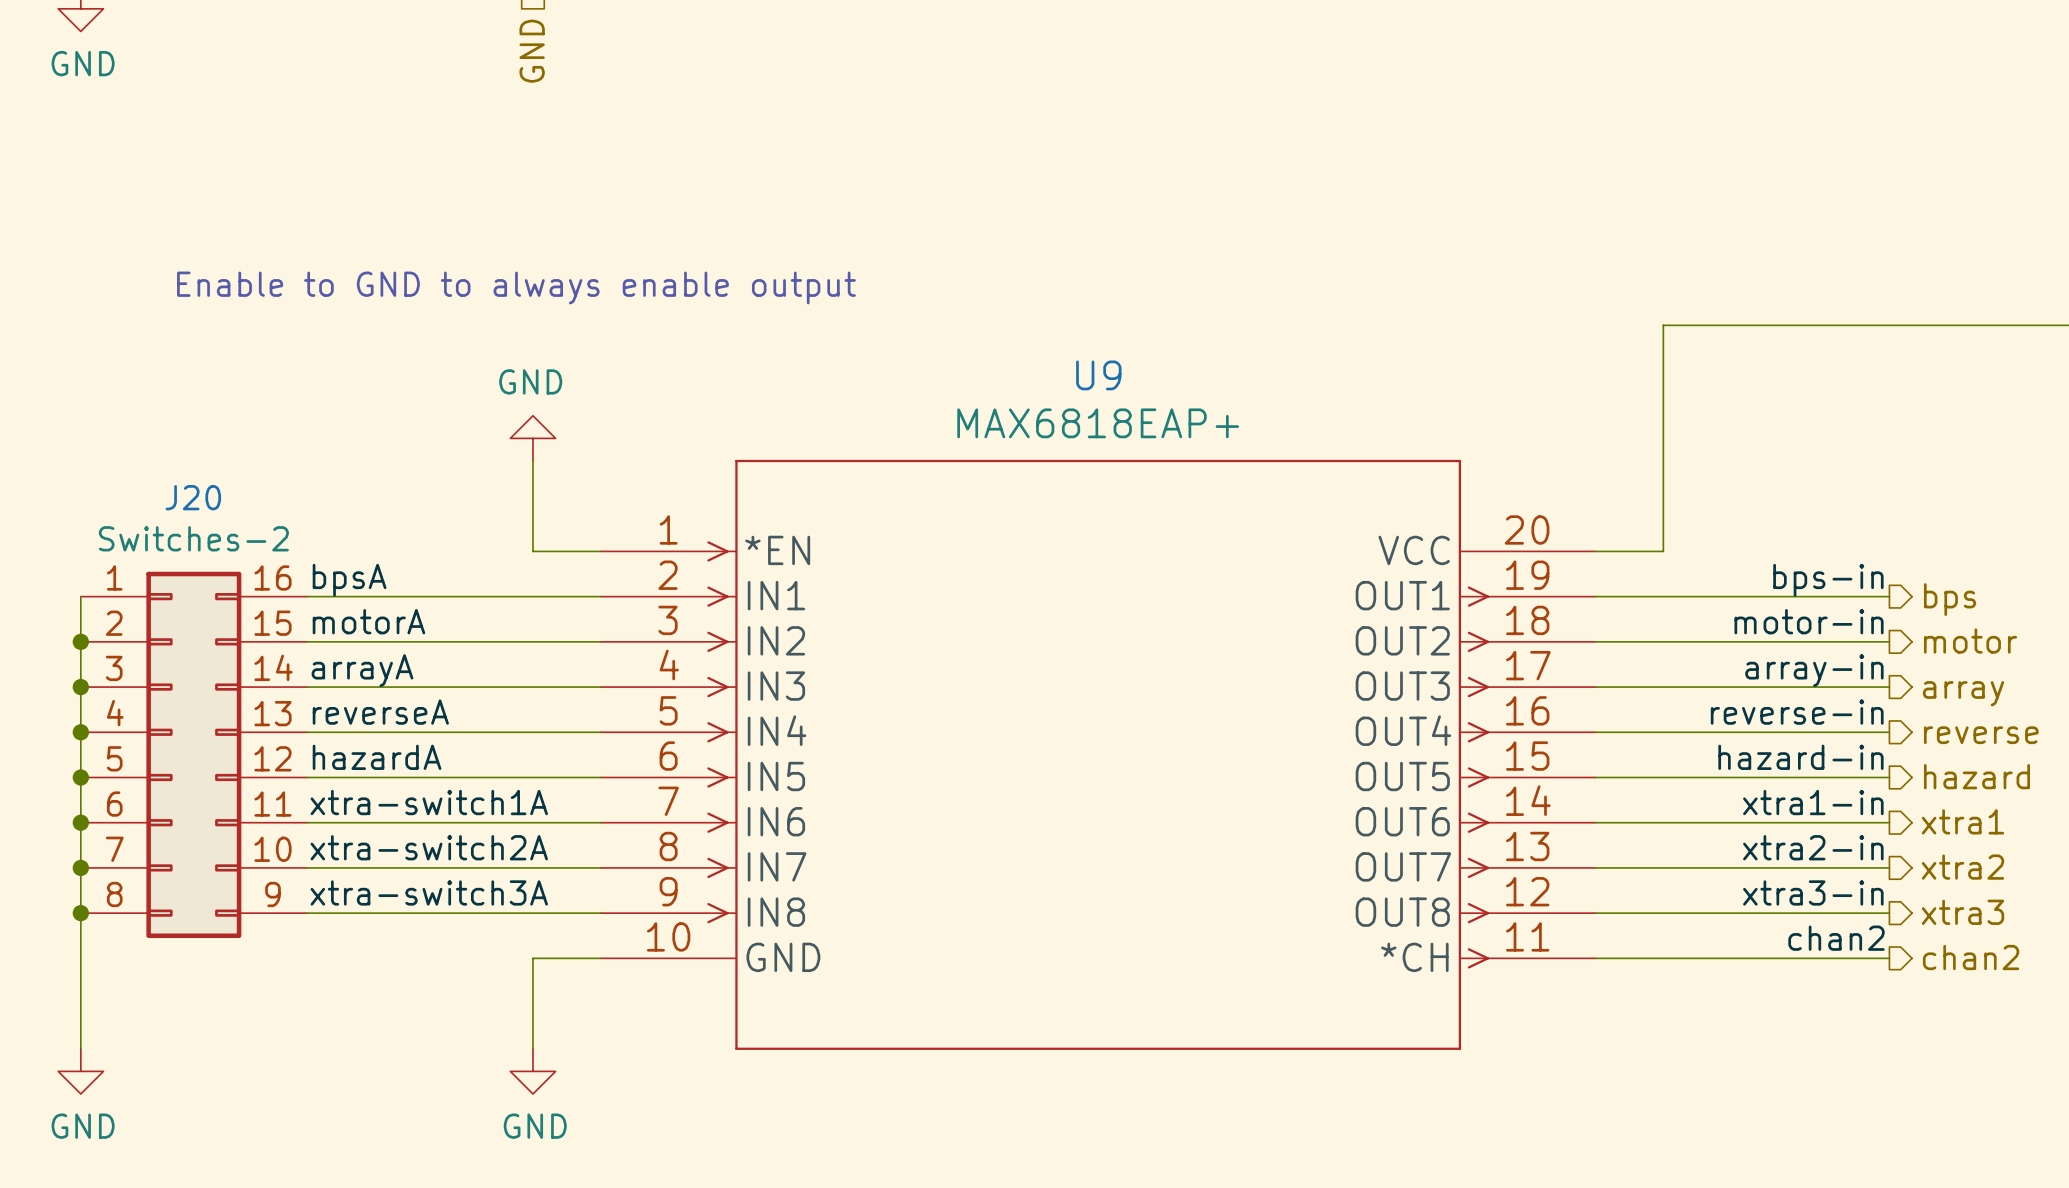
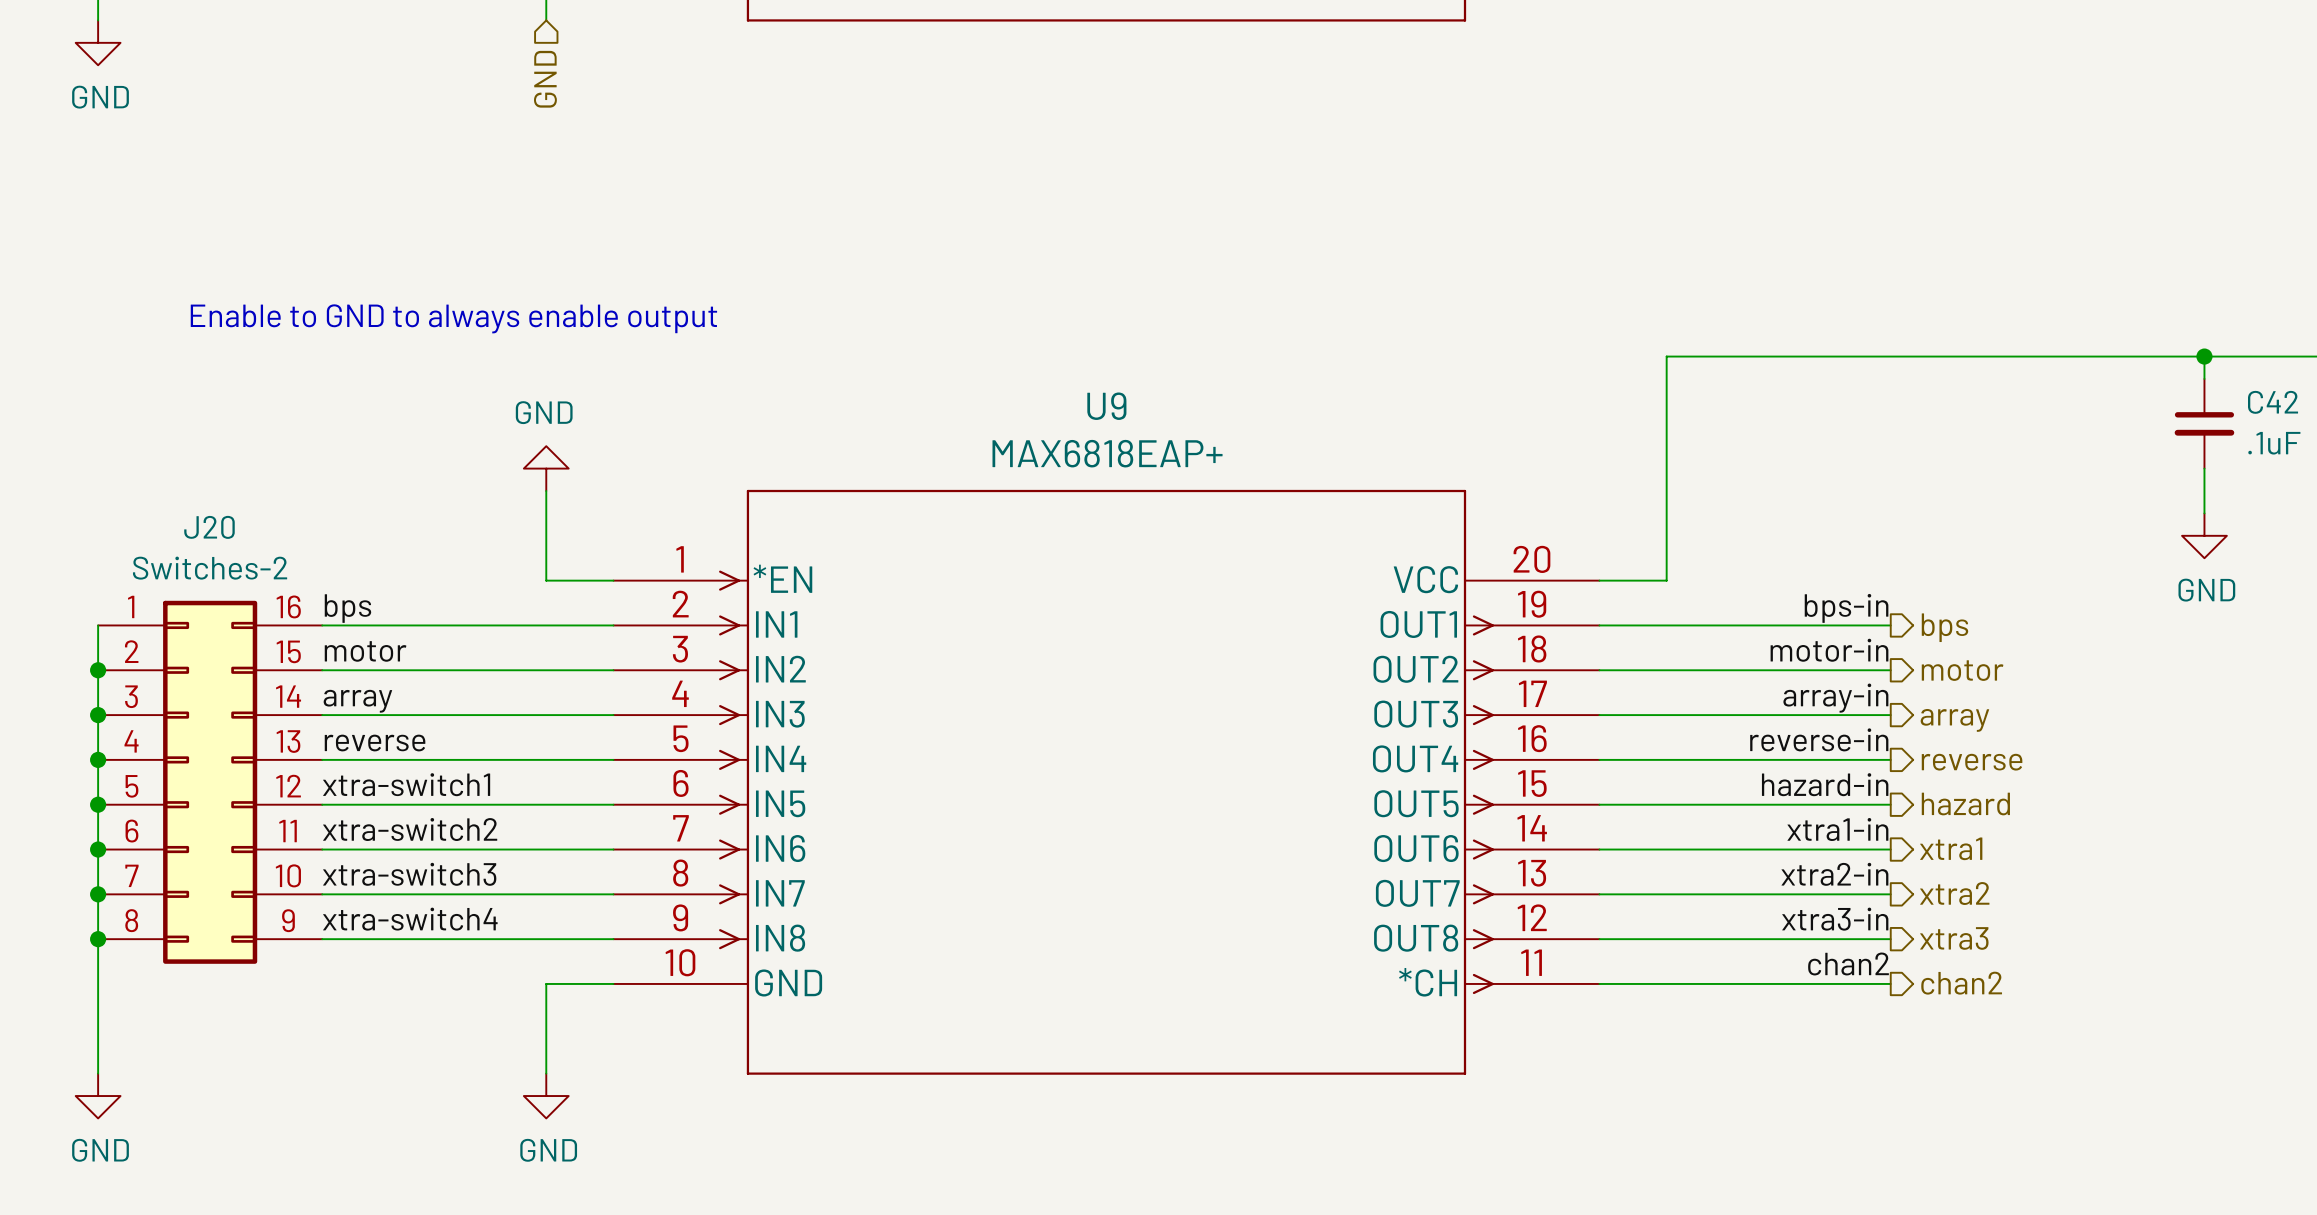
label: bpsA (349, 580) -> bps (347, 608)
label: motorA (368, 621) -> motor (365, 651)
label: arrayA (362, 670) -> array (357, 701)
label: reverseA (380, 712) -> reverse (375, 743)
label: hazardA (377, 757) -> xtra-switch1 (406, 784)
label: xtra-switch1A (429, 802) -> xtra-switch2 (410, 829)
label: xtra-switch2A (429, 847) -> xtra-switch3 (409, 874)
label: xtra-switch3A (429, 892) -> xtra-switch4 (410, 919)

